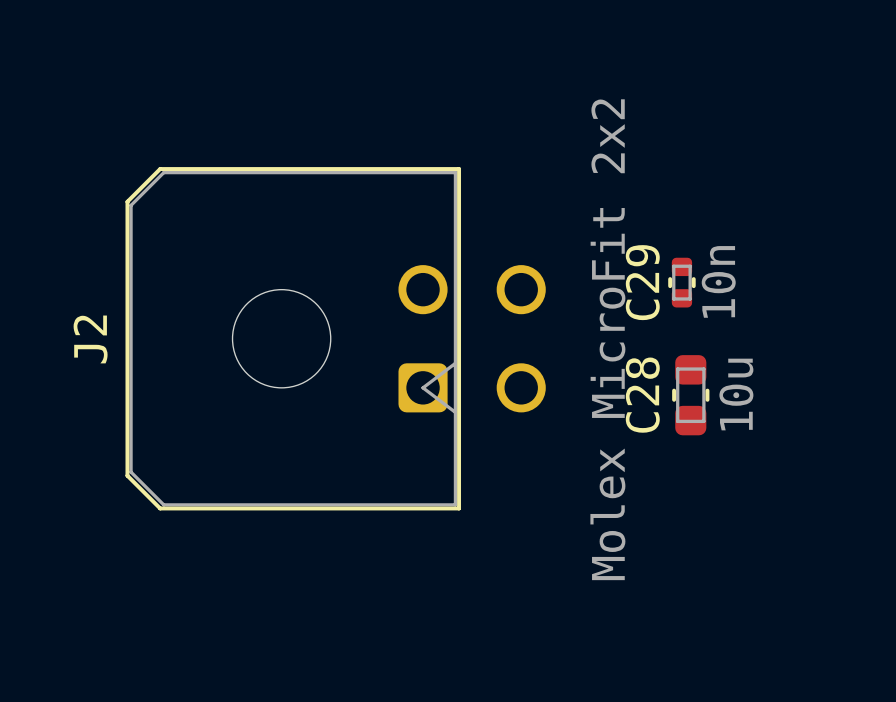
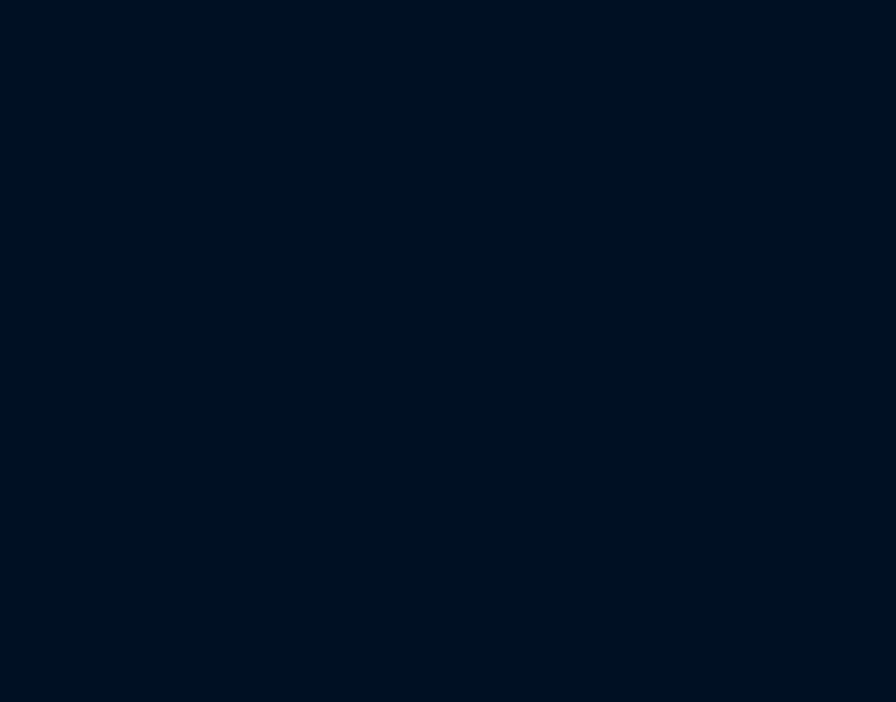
C29: 10n (681, 282) -> none
J2: Molex MicroFit 2x2 (335, 338) -> none
C28: 10u (690, 395) -> none

